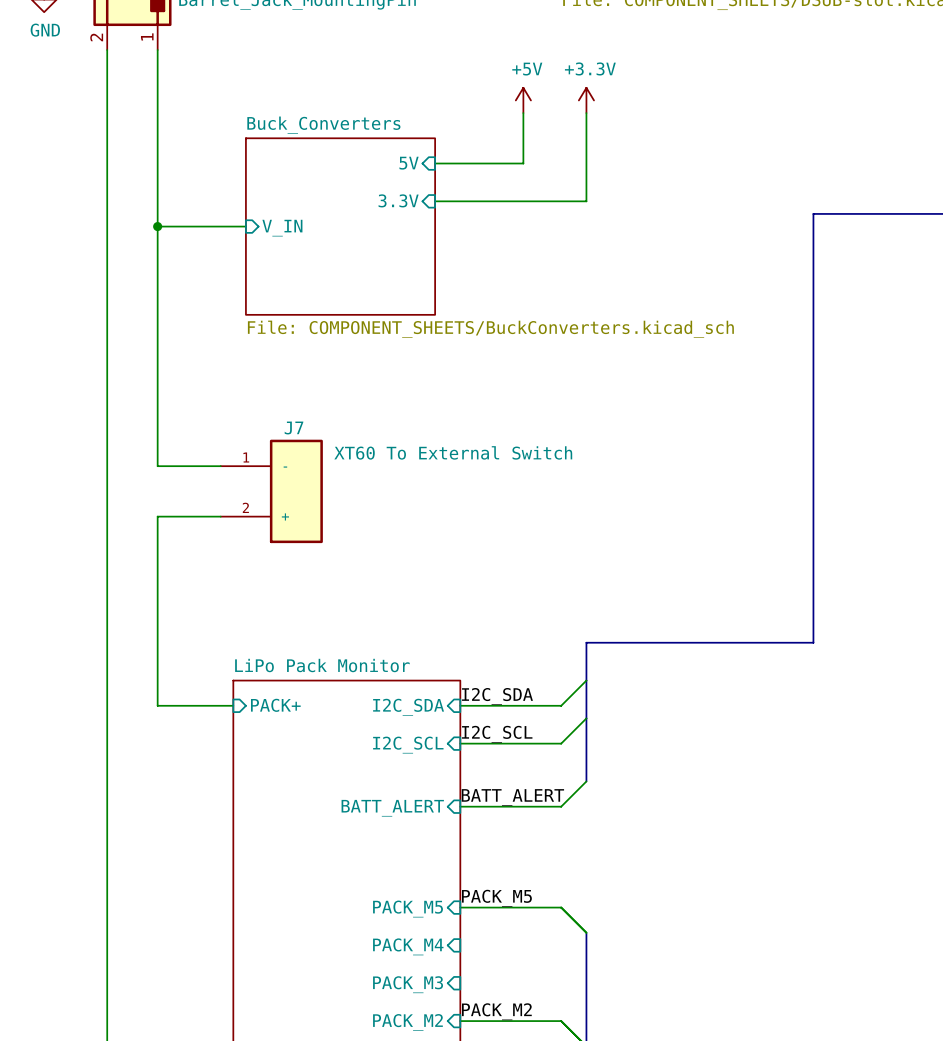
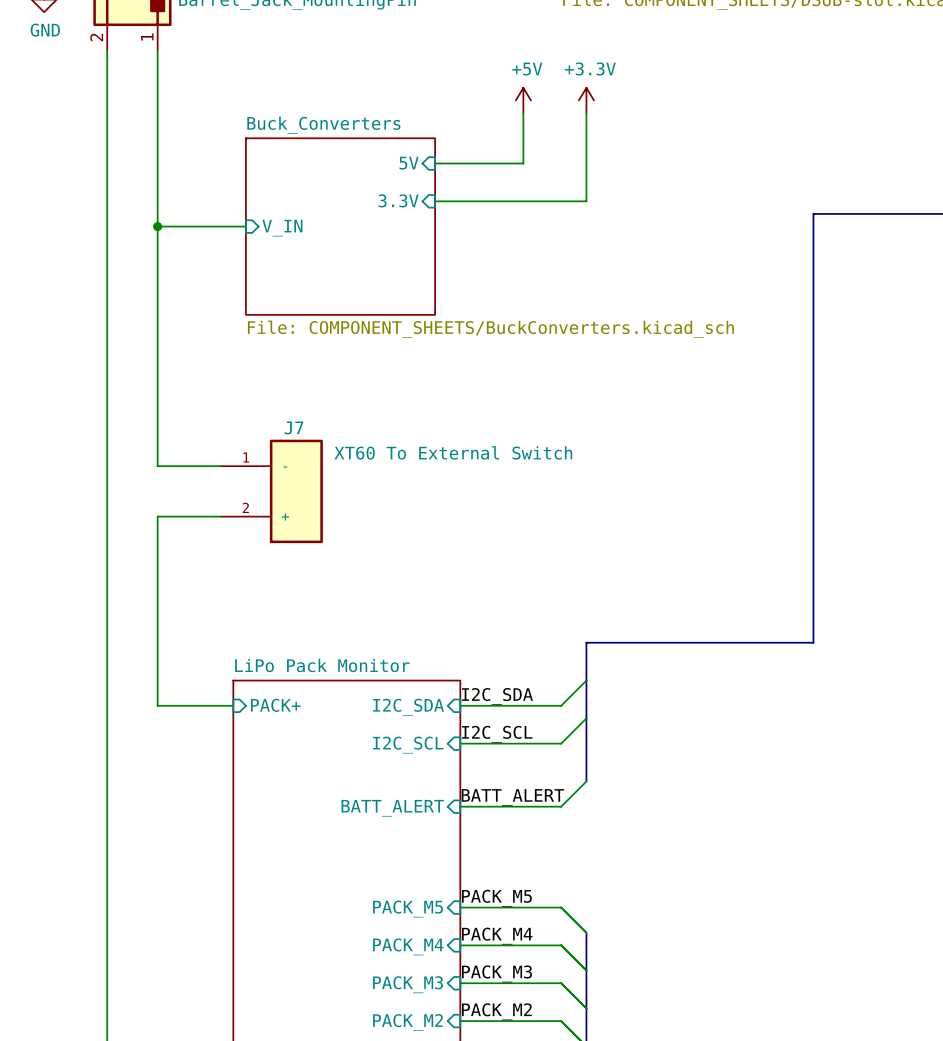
label: none -> PACK_M4 (497, 936)
wire: none -> (460, 945) (561, 945) (586, 970)
label: none -> PACK_M3 (496, 973)
wire: none -> (460, 983) (561, 983) (586, 1008)

